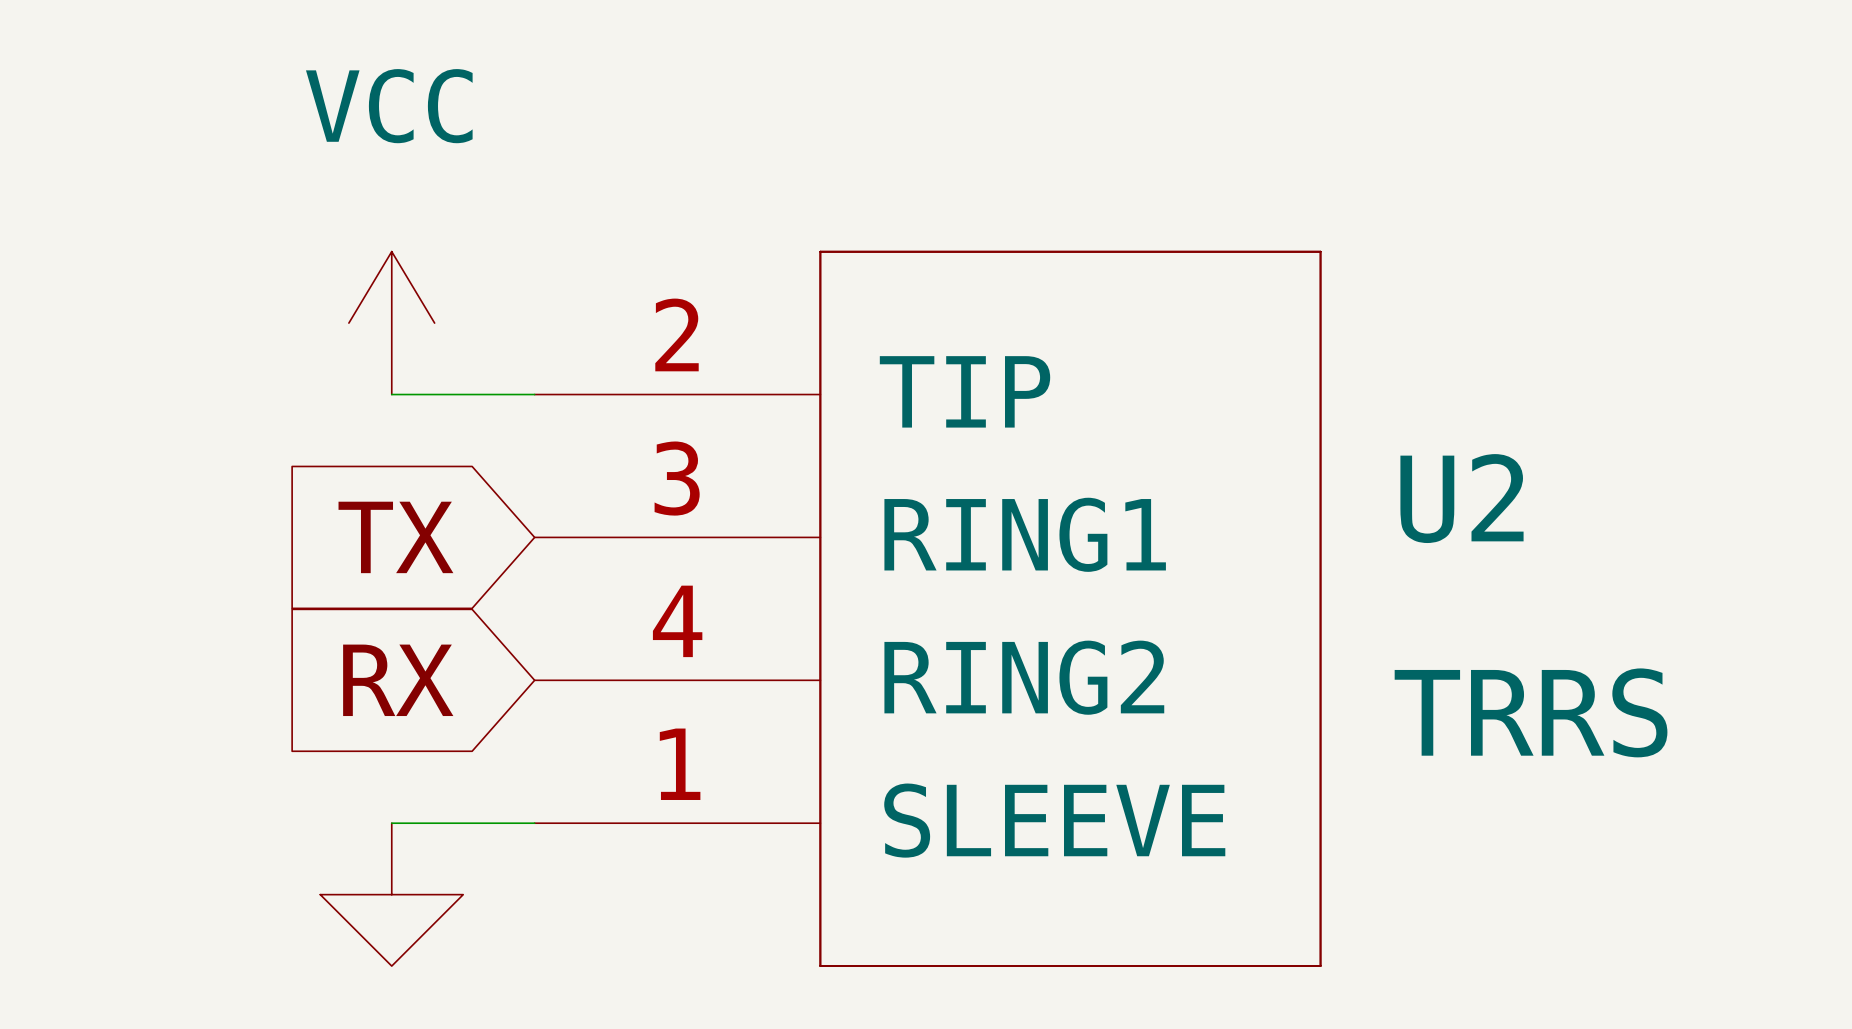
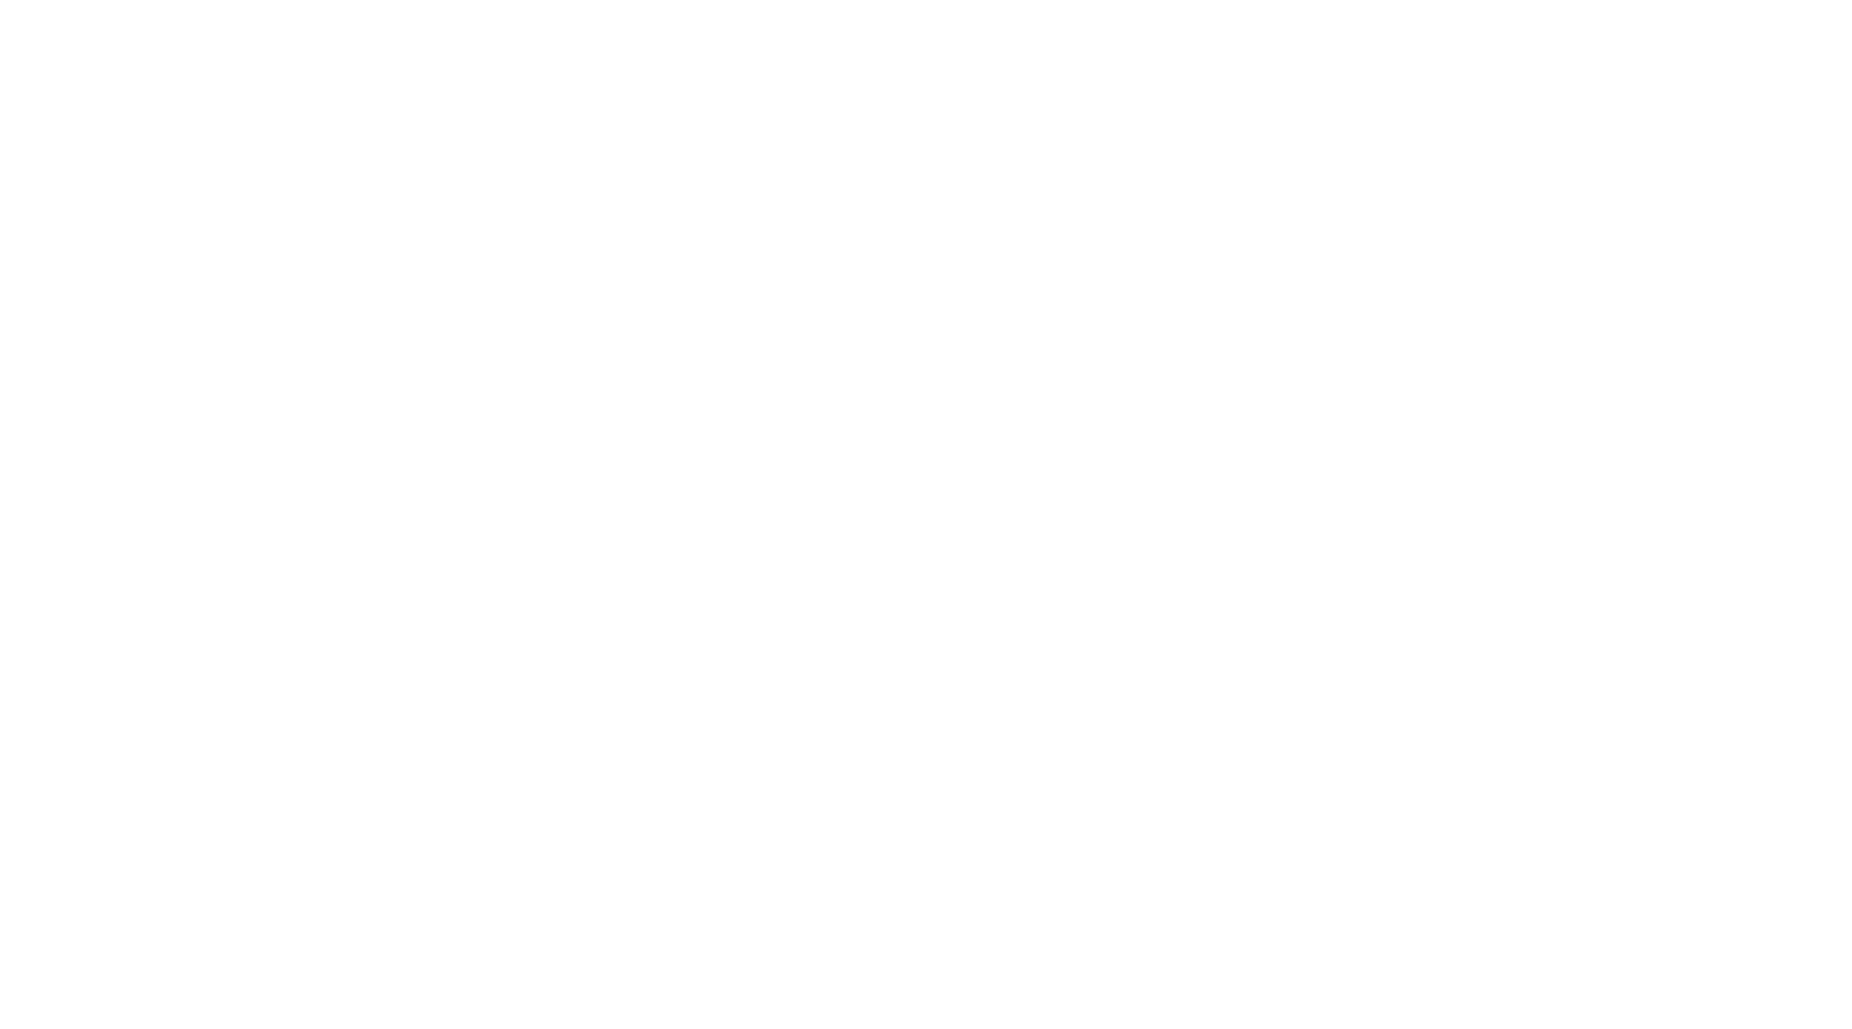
power symbol: VCC (391, 323) -> none
wire: (391, 394) (534, 394) -> none
global label: TX (395, 537) -> none
U2: TRRS (927, 608) -> none
global label: RX (398, 680) -> none
wire: (391, 823) (534, 823) -> none
power symbol: (391, 894) -> none

